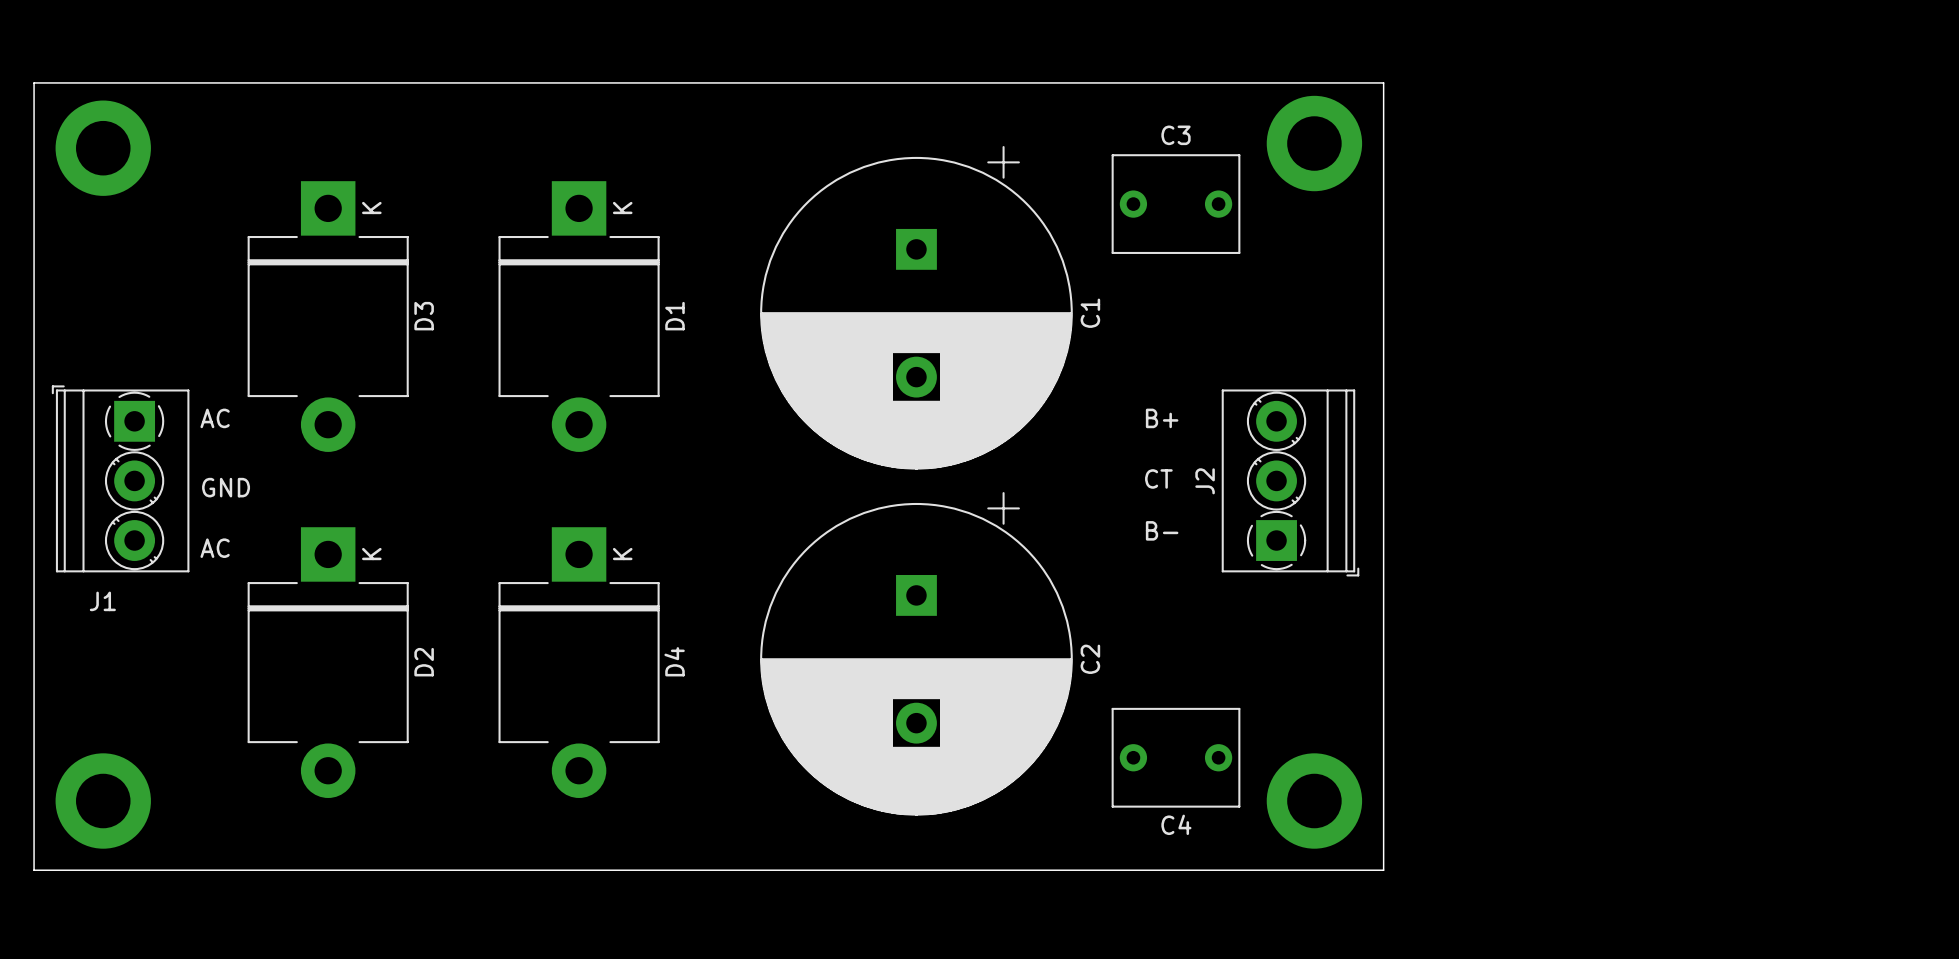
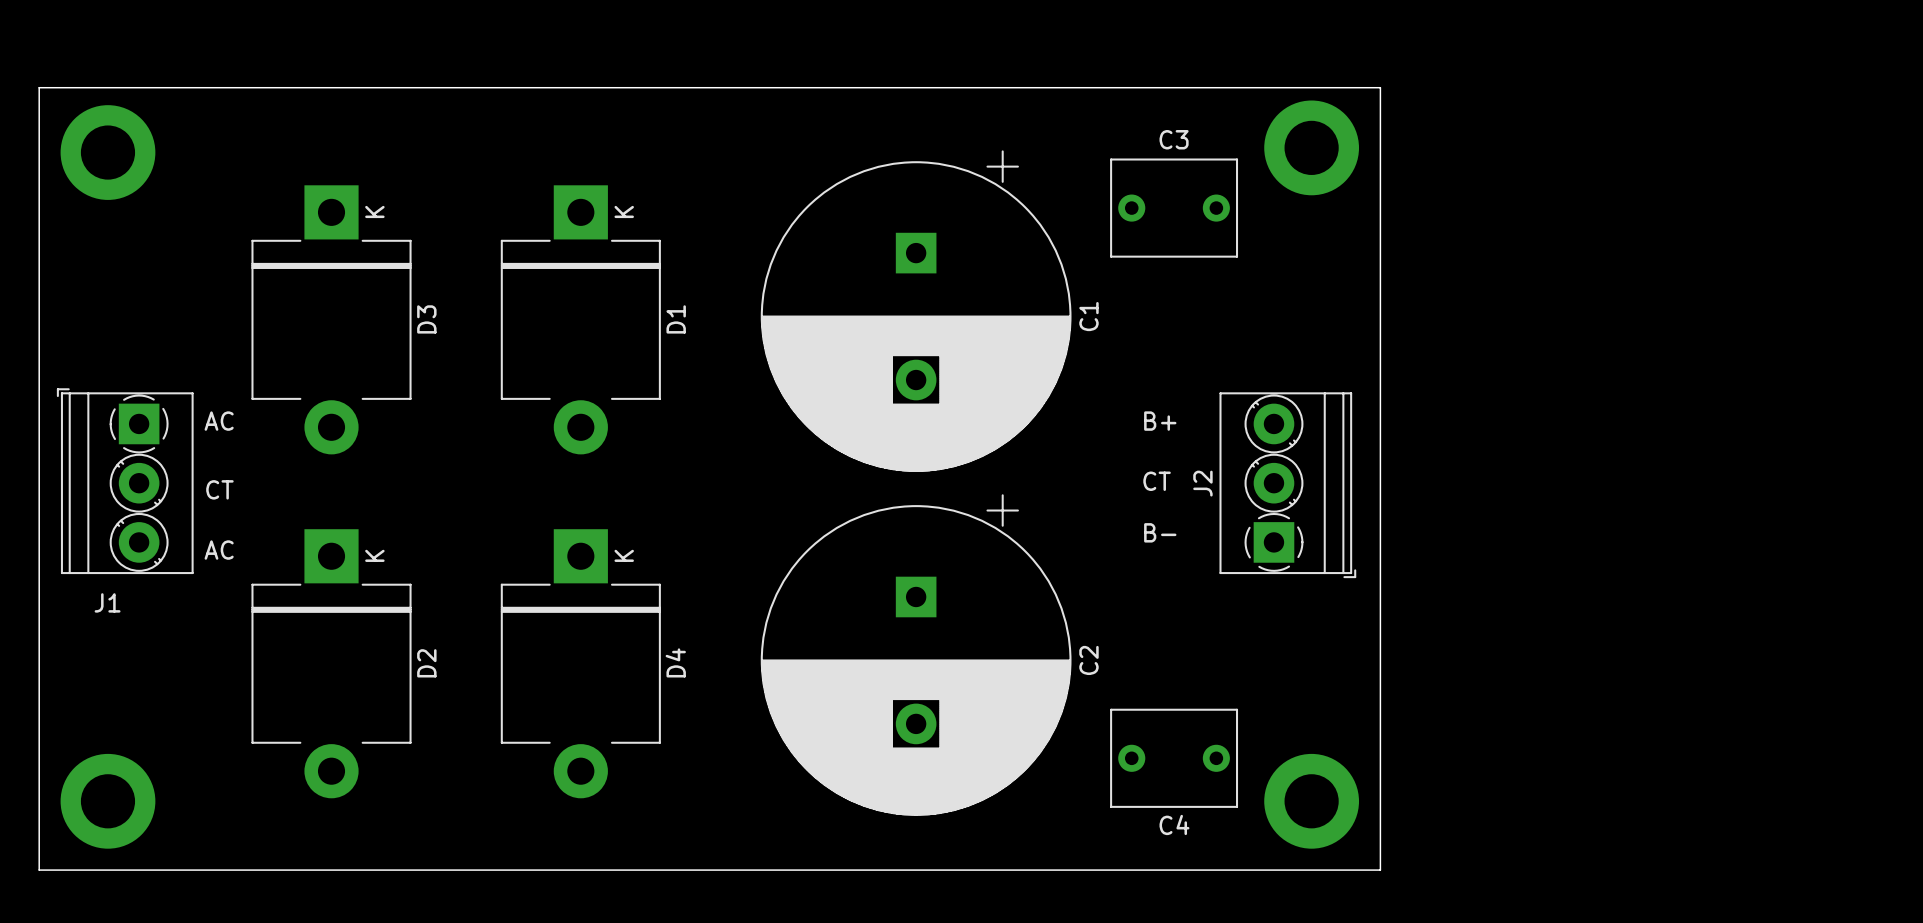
text: GND (226, 487) -> CT (219, 489)

